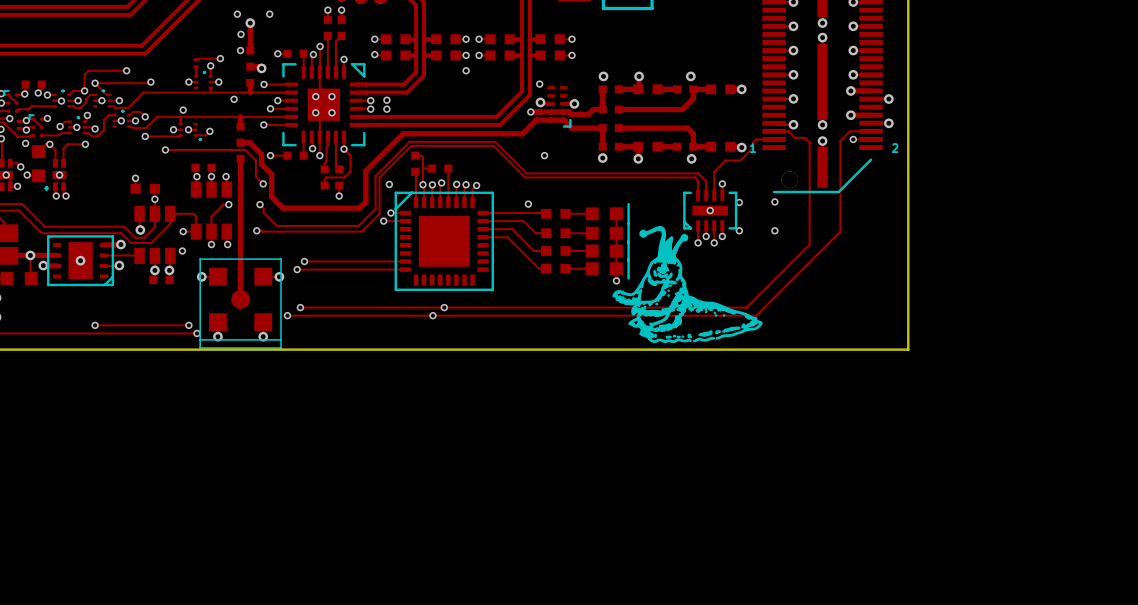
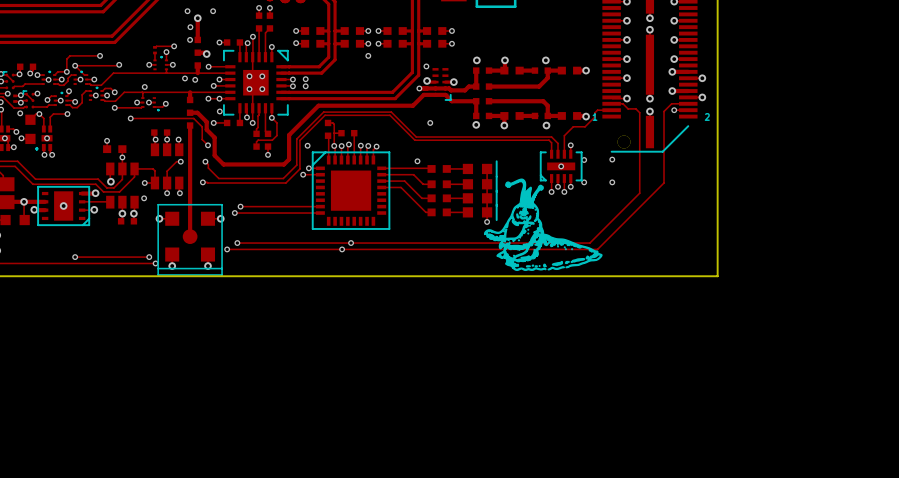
via: none -> (195, 79)
via: none -> (219, 98)
via: none -> (219, 111)

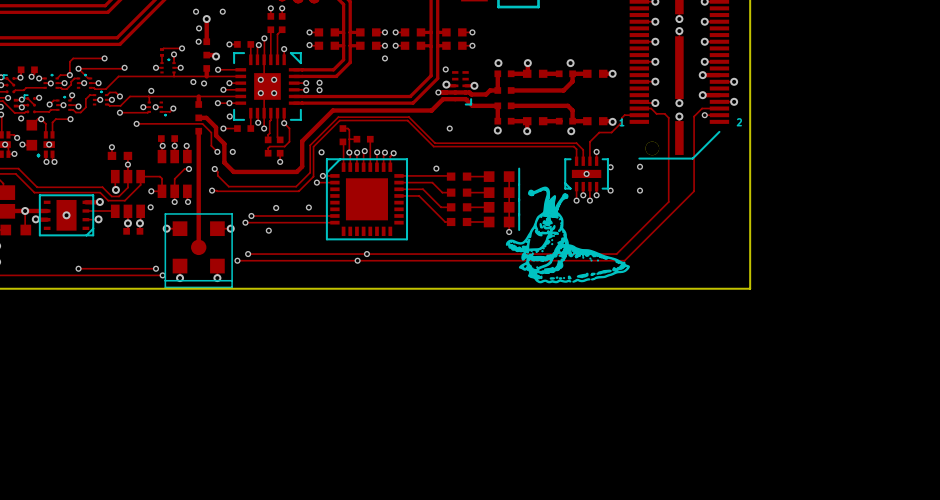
via: none -> (232, 151)
via: none -> (276, 207)
via: none -> (308, 207)
via: none -> (268, 230)

